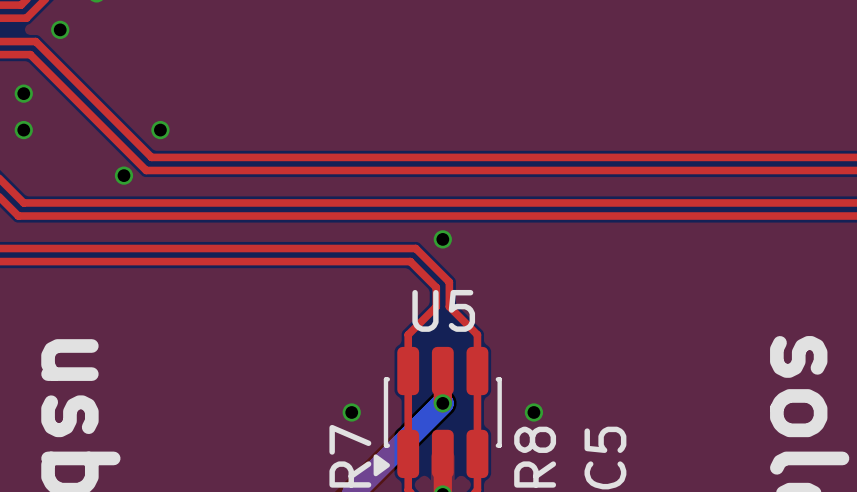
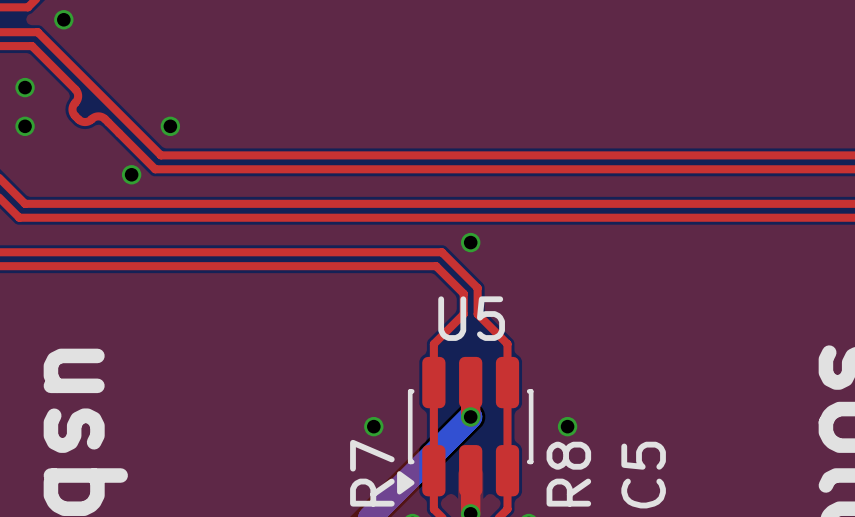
top track: (71, 95) (98, 123) -> (91, 119) (98, 116) (105, 119)
top track: none -> (75, 89) (78, 96) (75, 102)
top track: none -> (75, 102) (72, 111) (78, 119) (85, 122) (91, 119)

